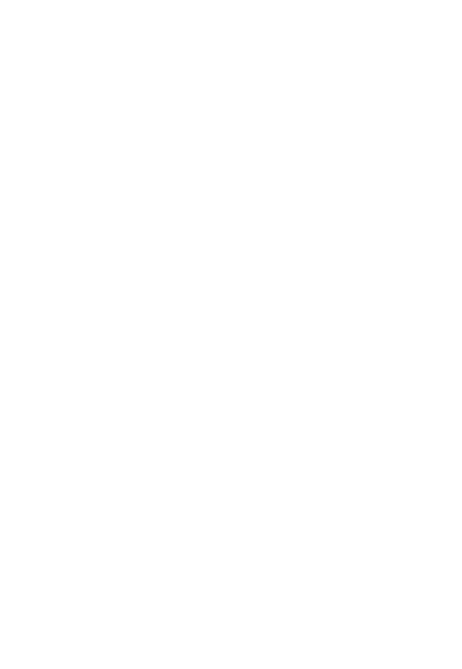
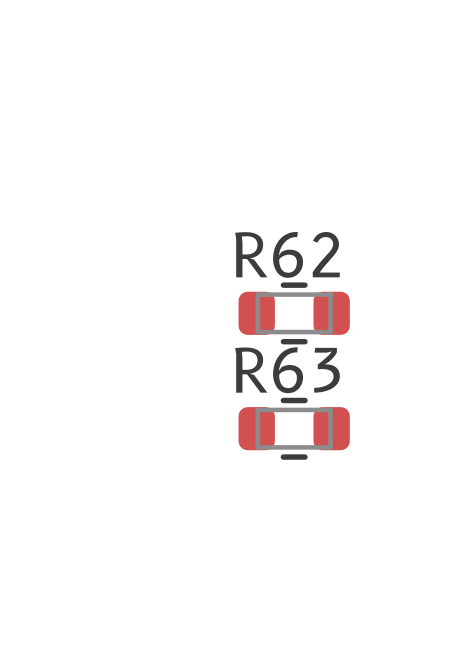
R62: none -> (294, 313)
R63: none -> (294, 428)

